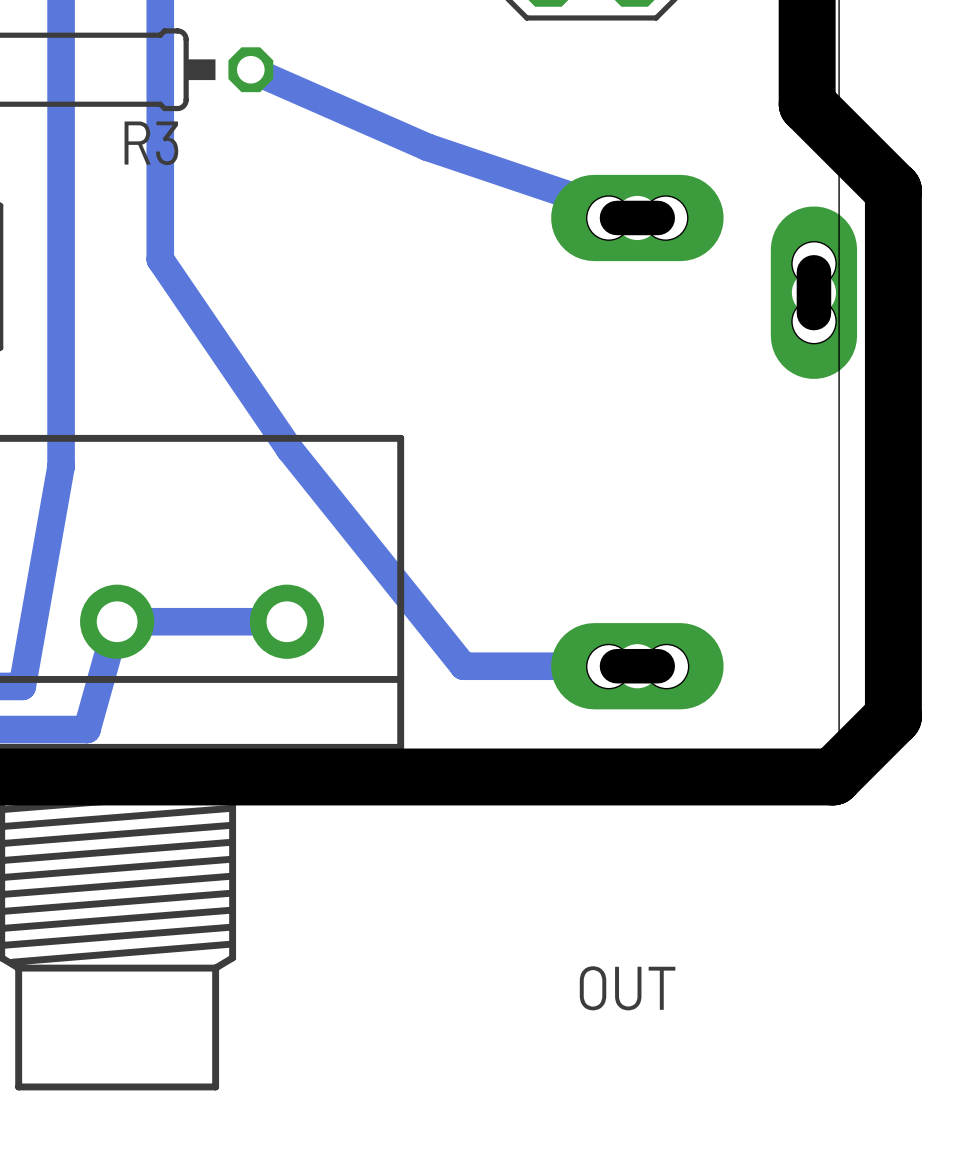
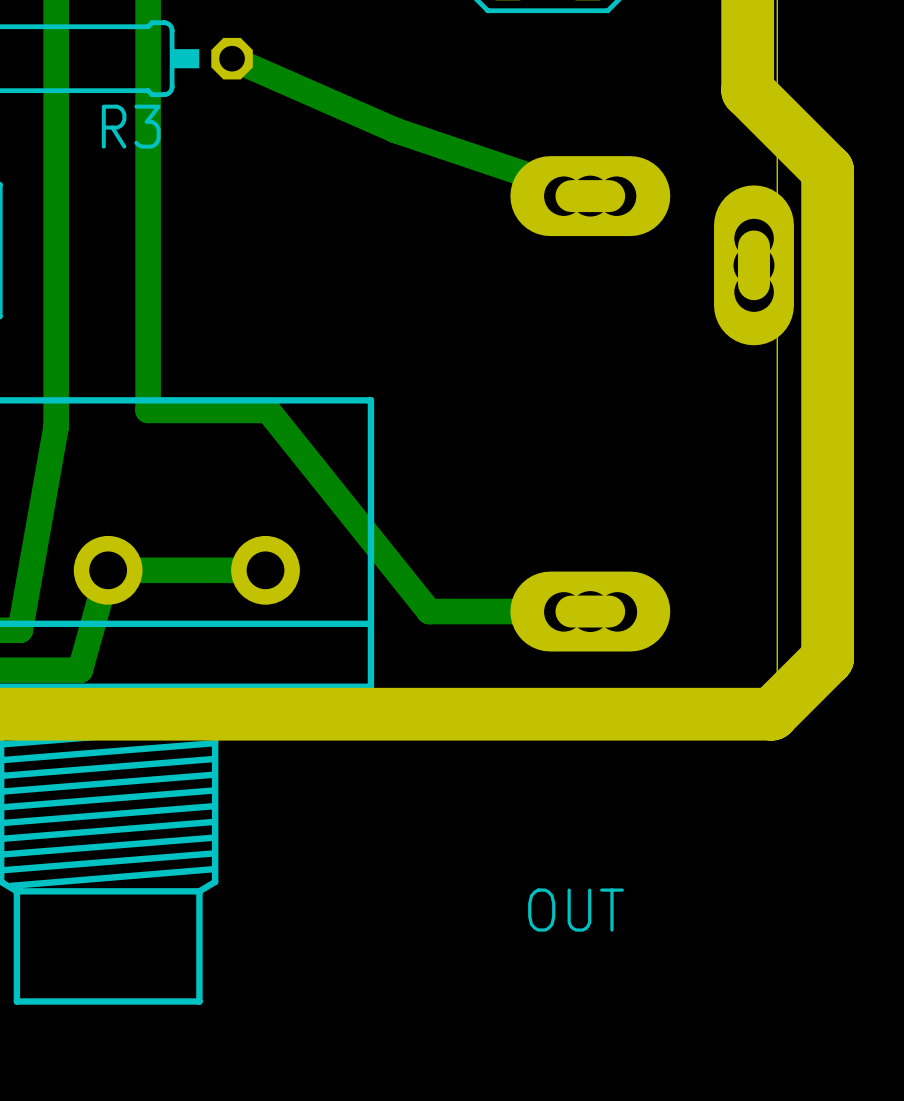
bottom track: (160, 259) (289, 449) -> (148, 234) (148, 410) (268, 410)

